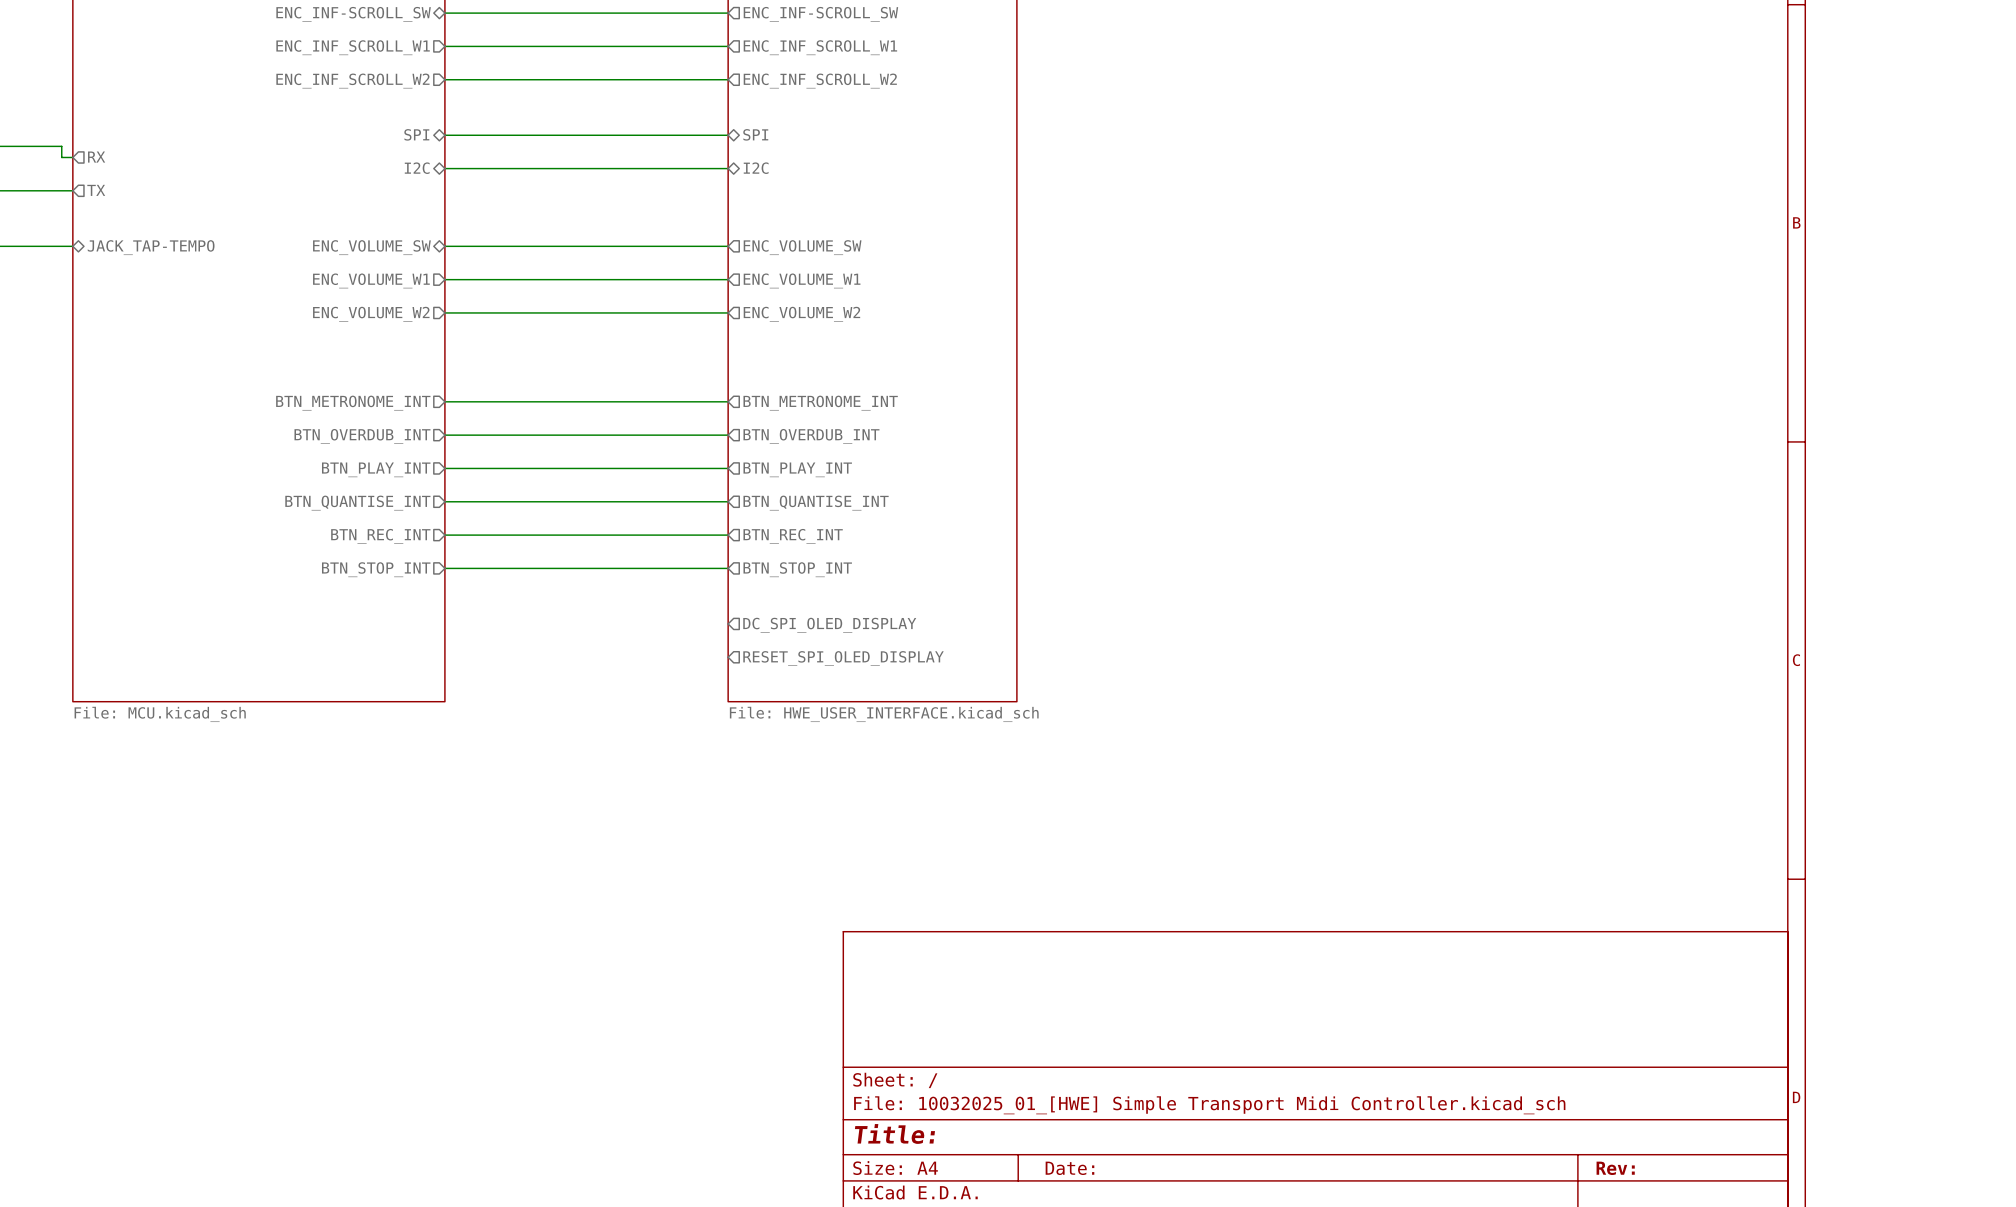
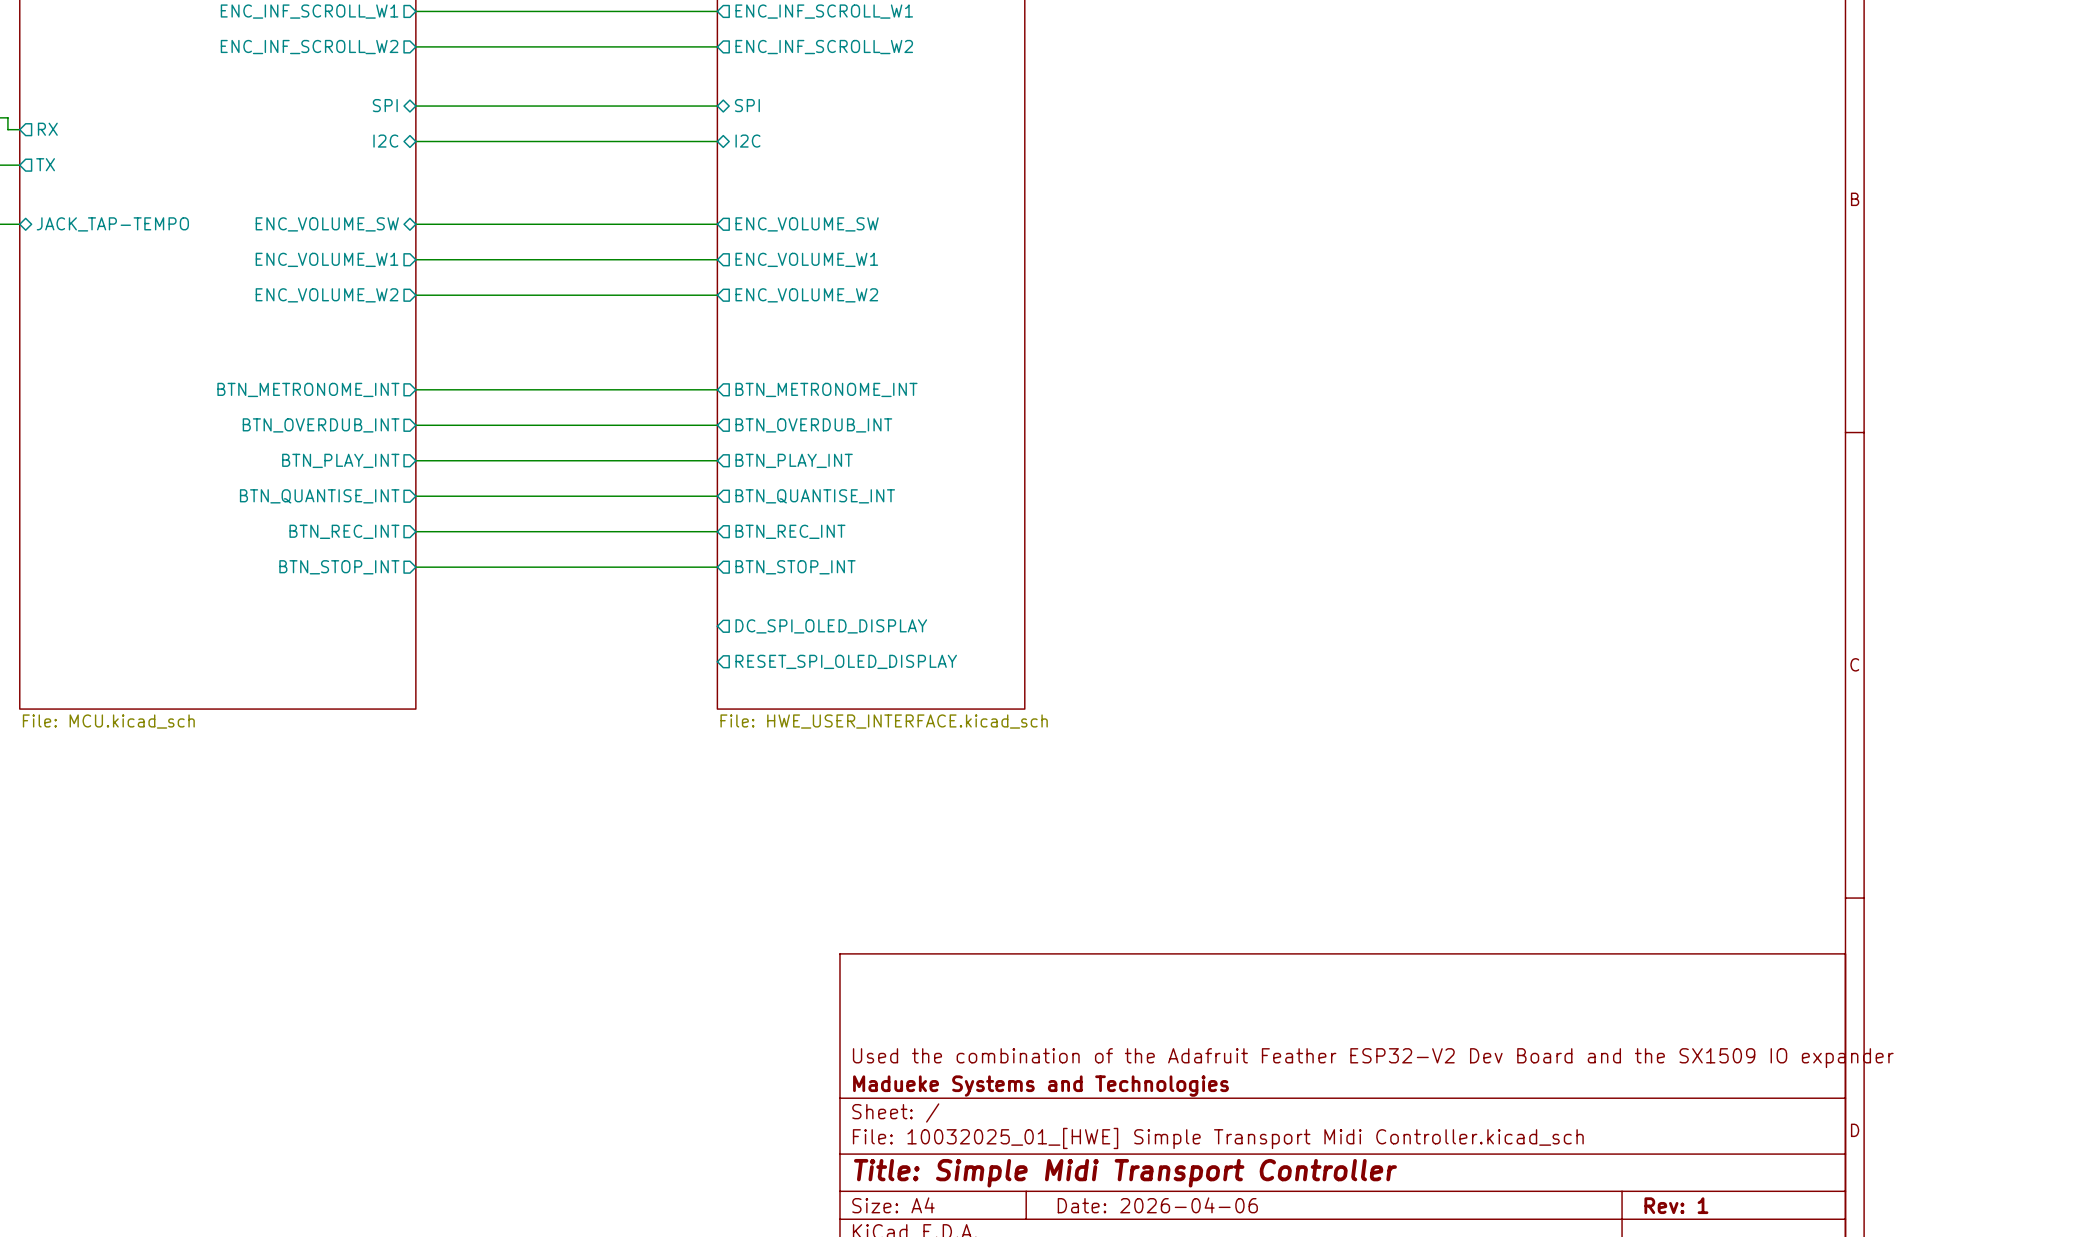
title block: none -> Used the combination of the Adafruit Feather ESP32-V2 Dev Board and the SX1509 IO expander (1373, 1058)
title block: none -> Madueke Systems and Technologies (1041, 1086)
title block: Title: (894, 1133) -> Title: Simple Midi Transport Controller (1125, 1173)
title block: Date: (1069, 1168) -> Date: 2026-04-06 (1157, 1205)
title block: Rev: (1615, 1168) -> Rev: 1 (1676, 1205)

